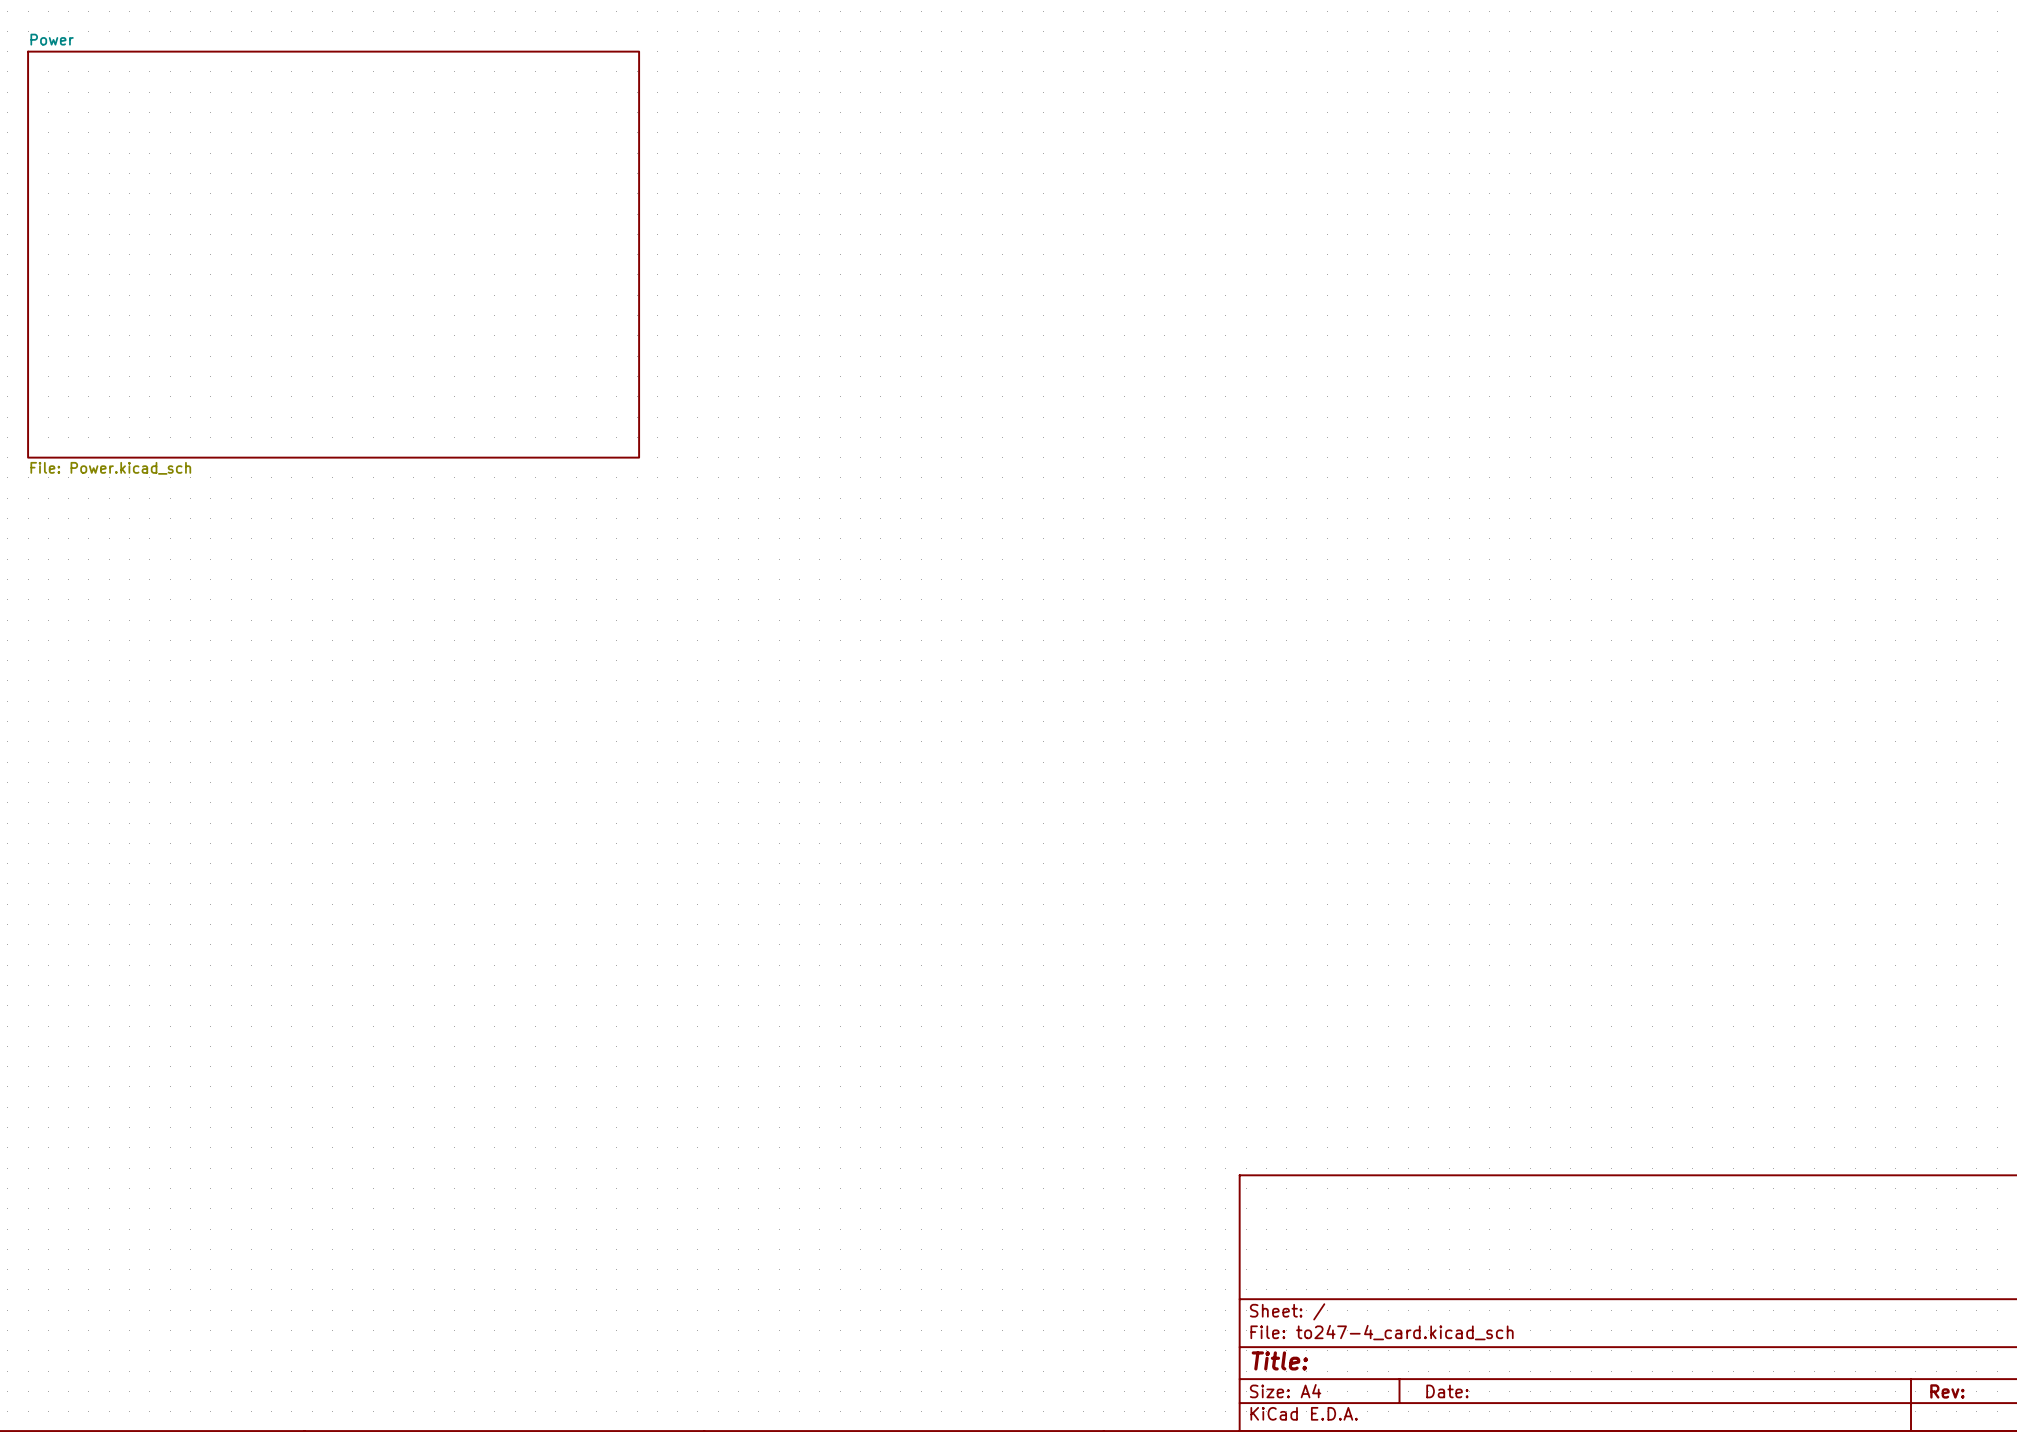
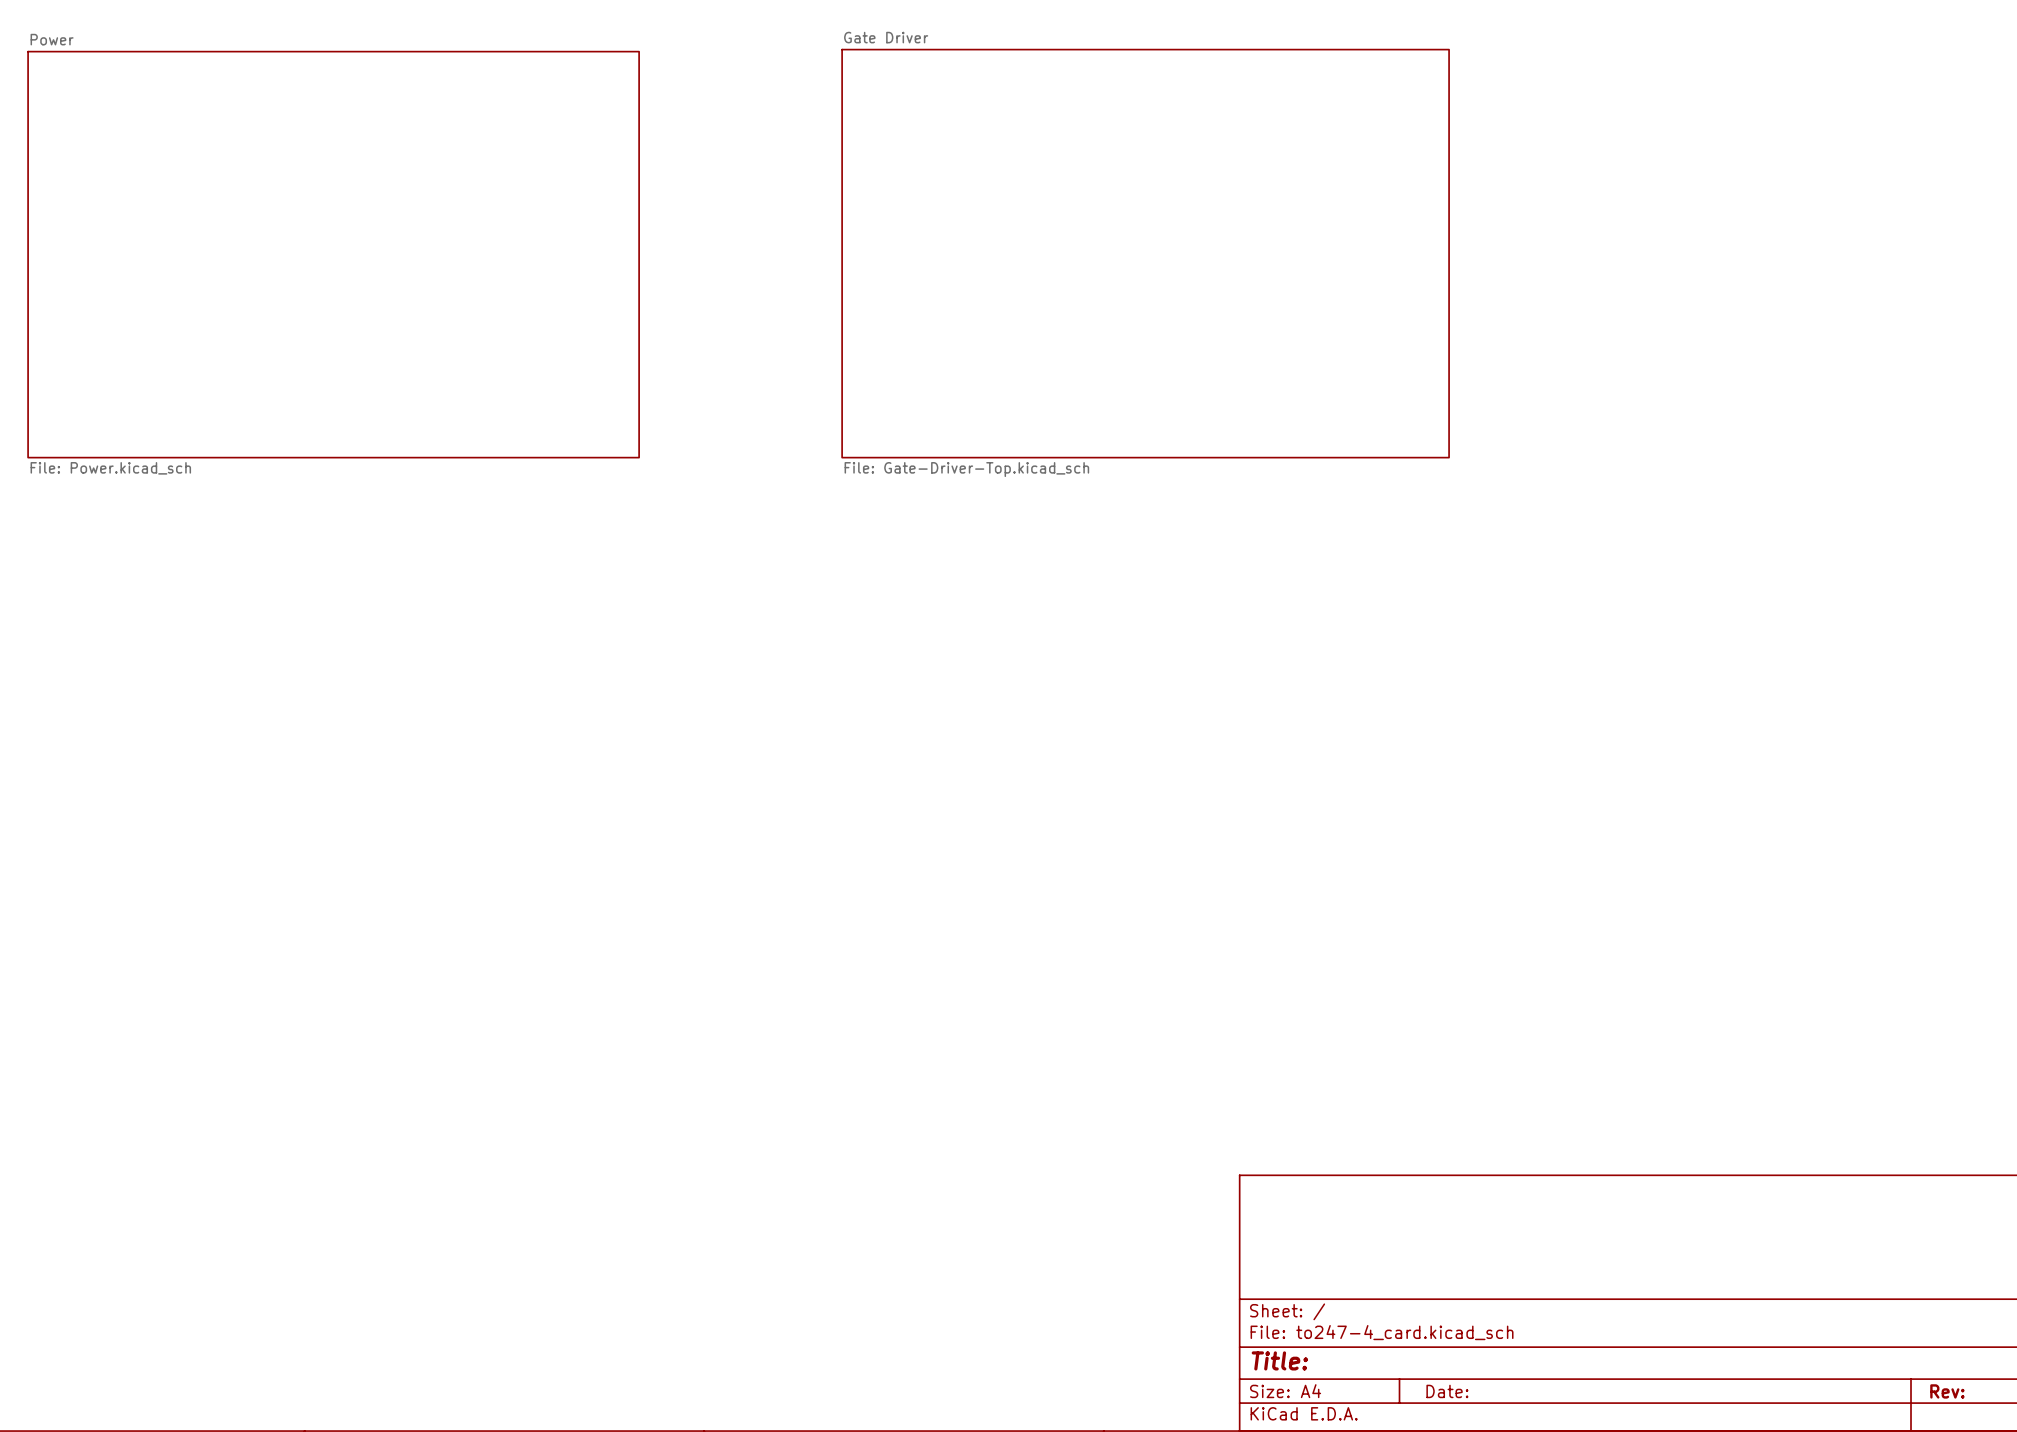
sheet Gate Driver: none -> File: Gate-Driver-Top.kicad_sch (1145, 253)

